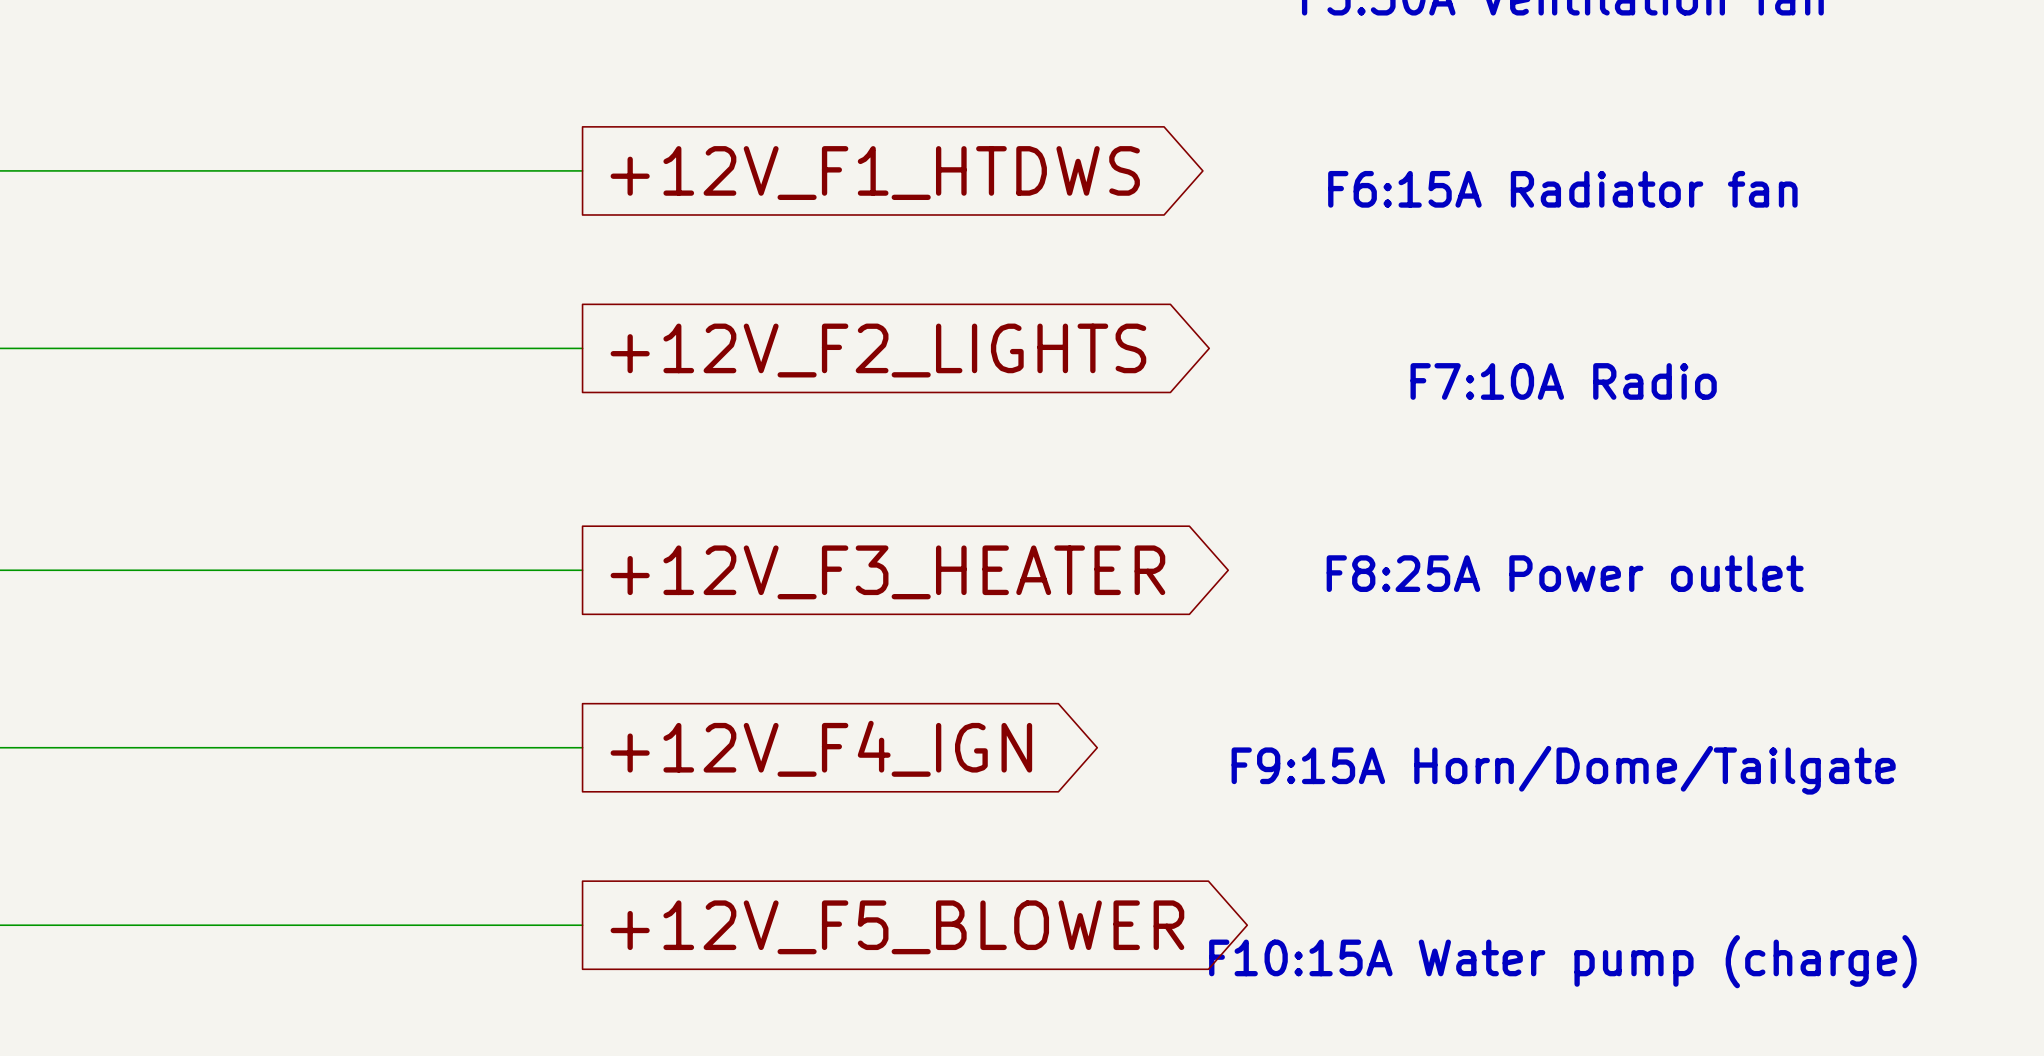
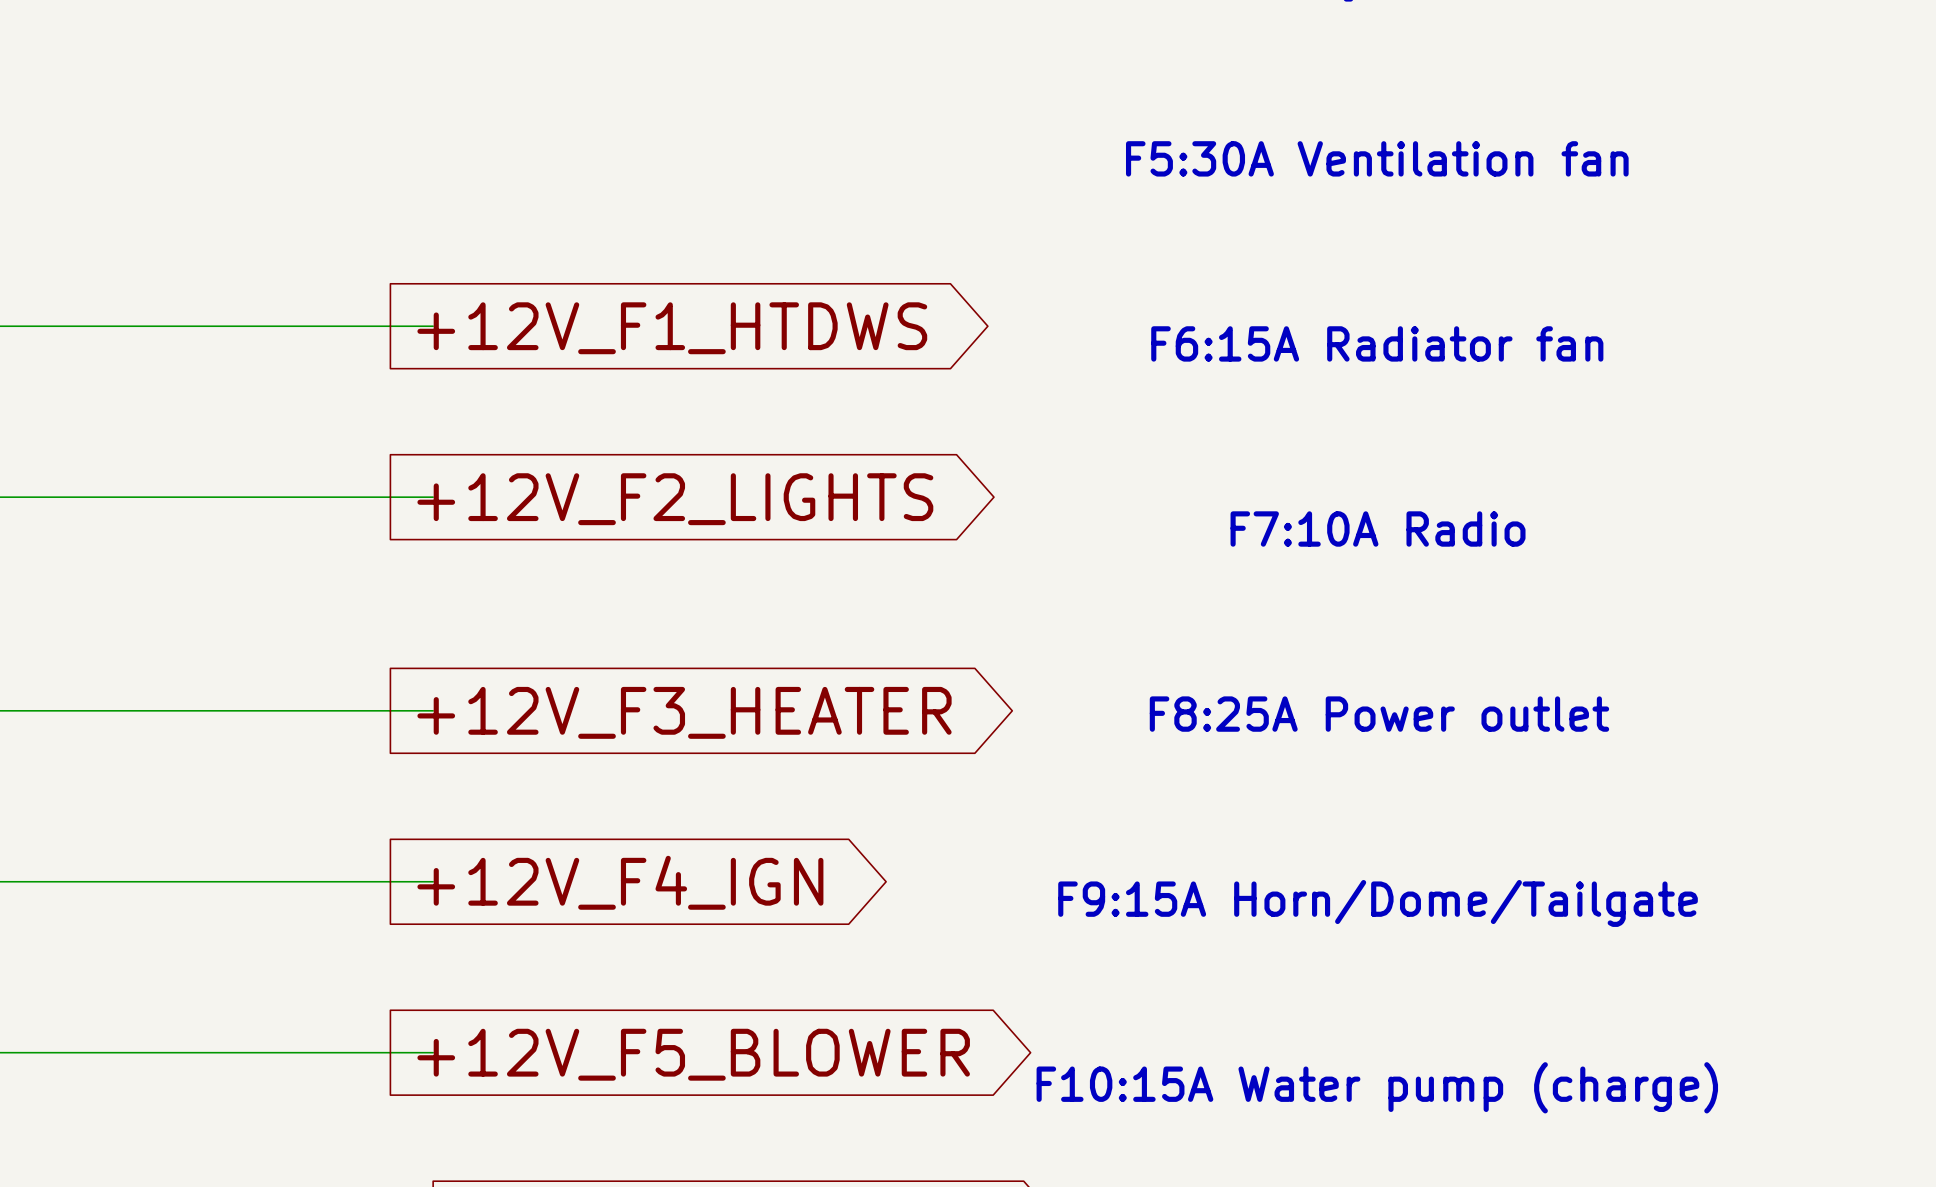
global label position: +12V_F1_HTDWS (875, 173) -> +12V_F1_HTDWS (672, 328)
global label position: +12V_F2_LIGHTS (878, 350) -> +12V_F2_LIGHTS (675, 499)
global label position: +12V_F3_HEATER (887, 572) -> +12V_F3_HEATER (684, 712)
global label position: +12V_F4_IGN (821, 748) -> +12V_F4_IGN (620, 882)
global label position: +12V_F5_BLOWER (897, 927) -> +12V_F5_BLOWER (693, 1054)

